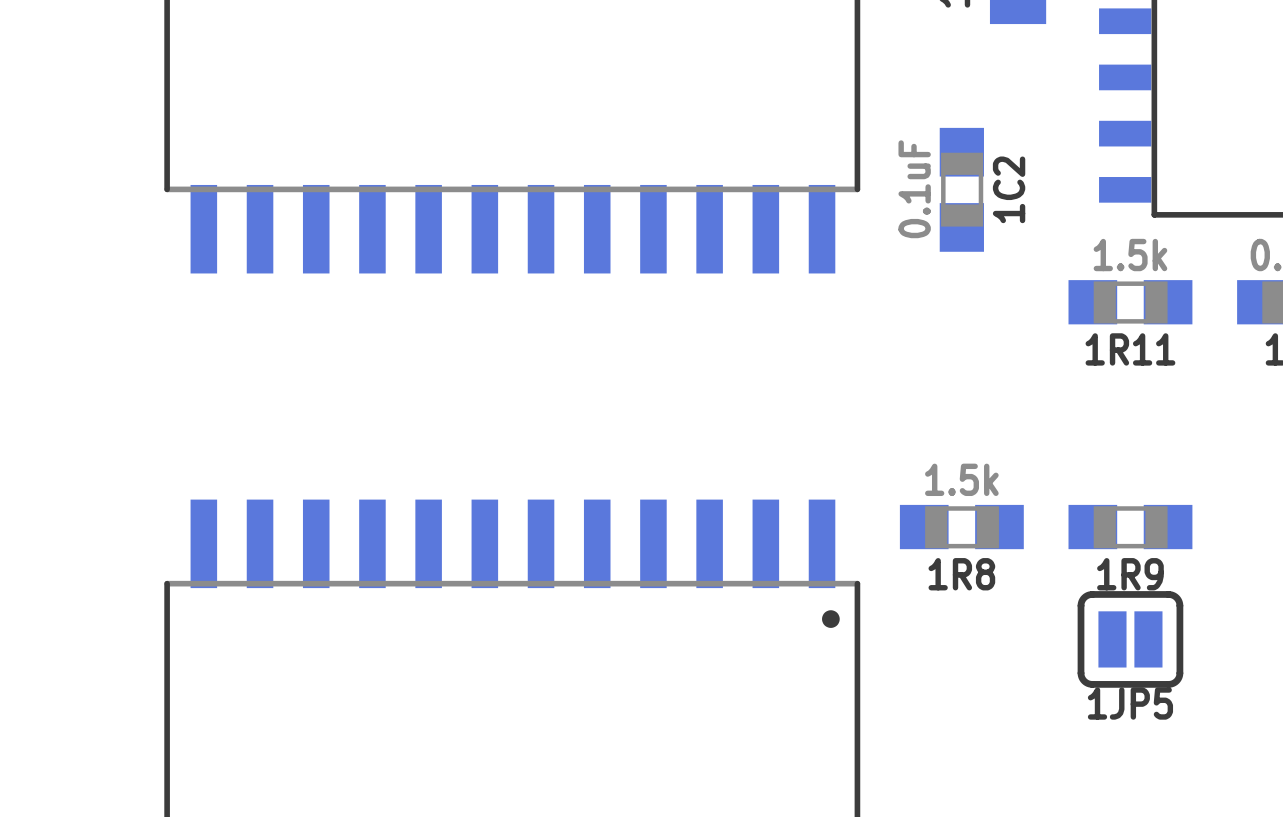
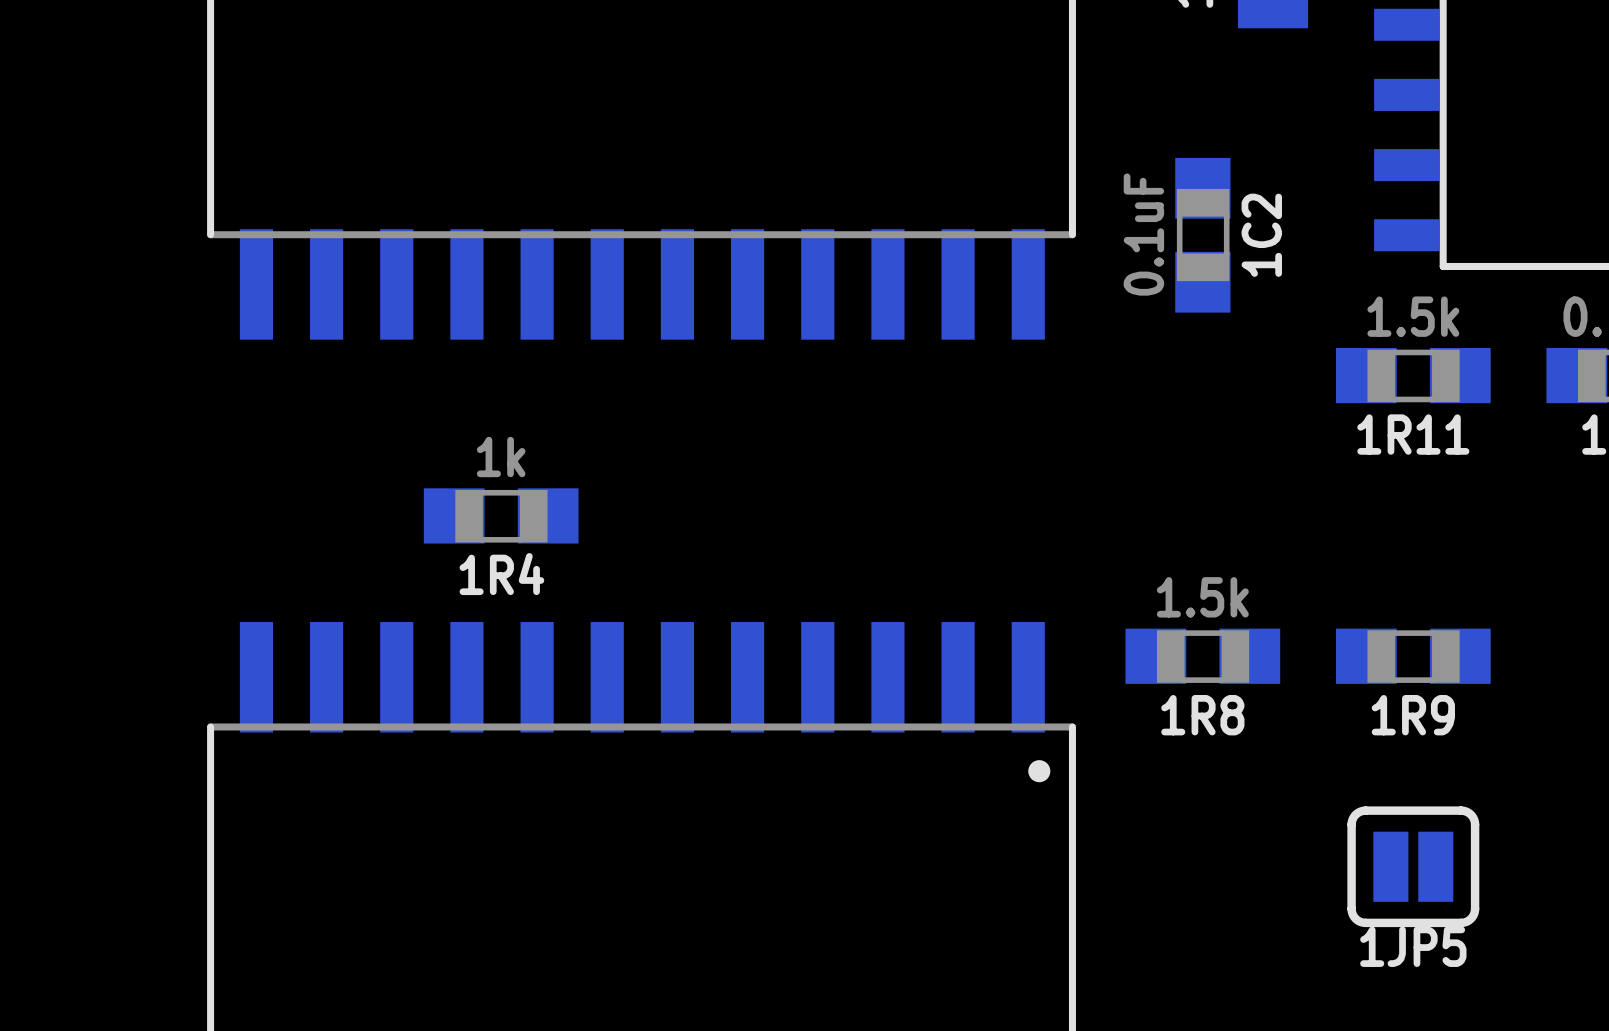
1R4: none -> 1k (501, 515)
1JP5 position: (1130, 639) -> (1413, 866)

